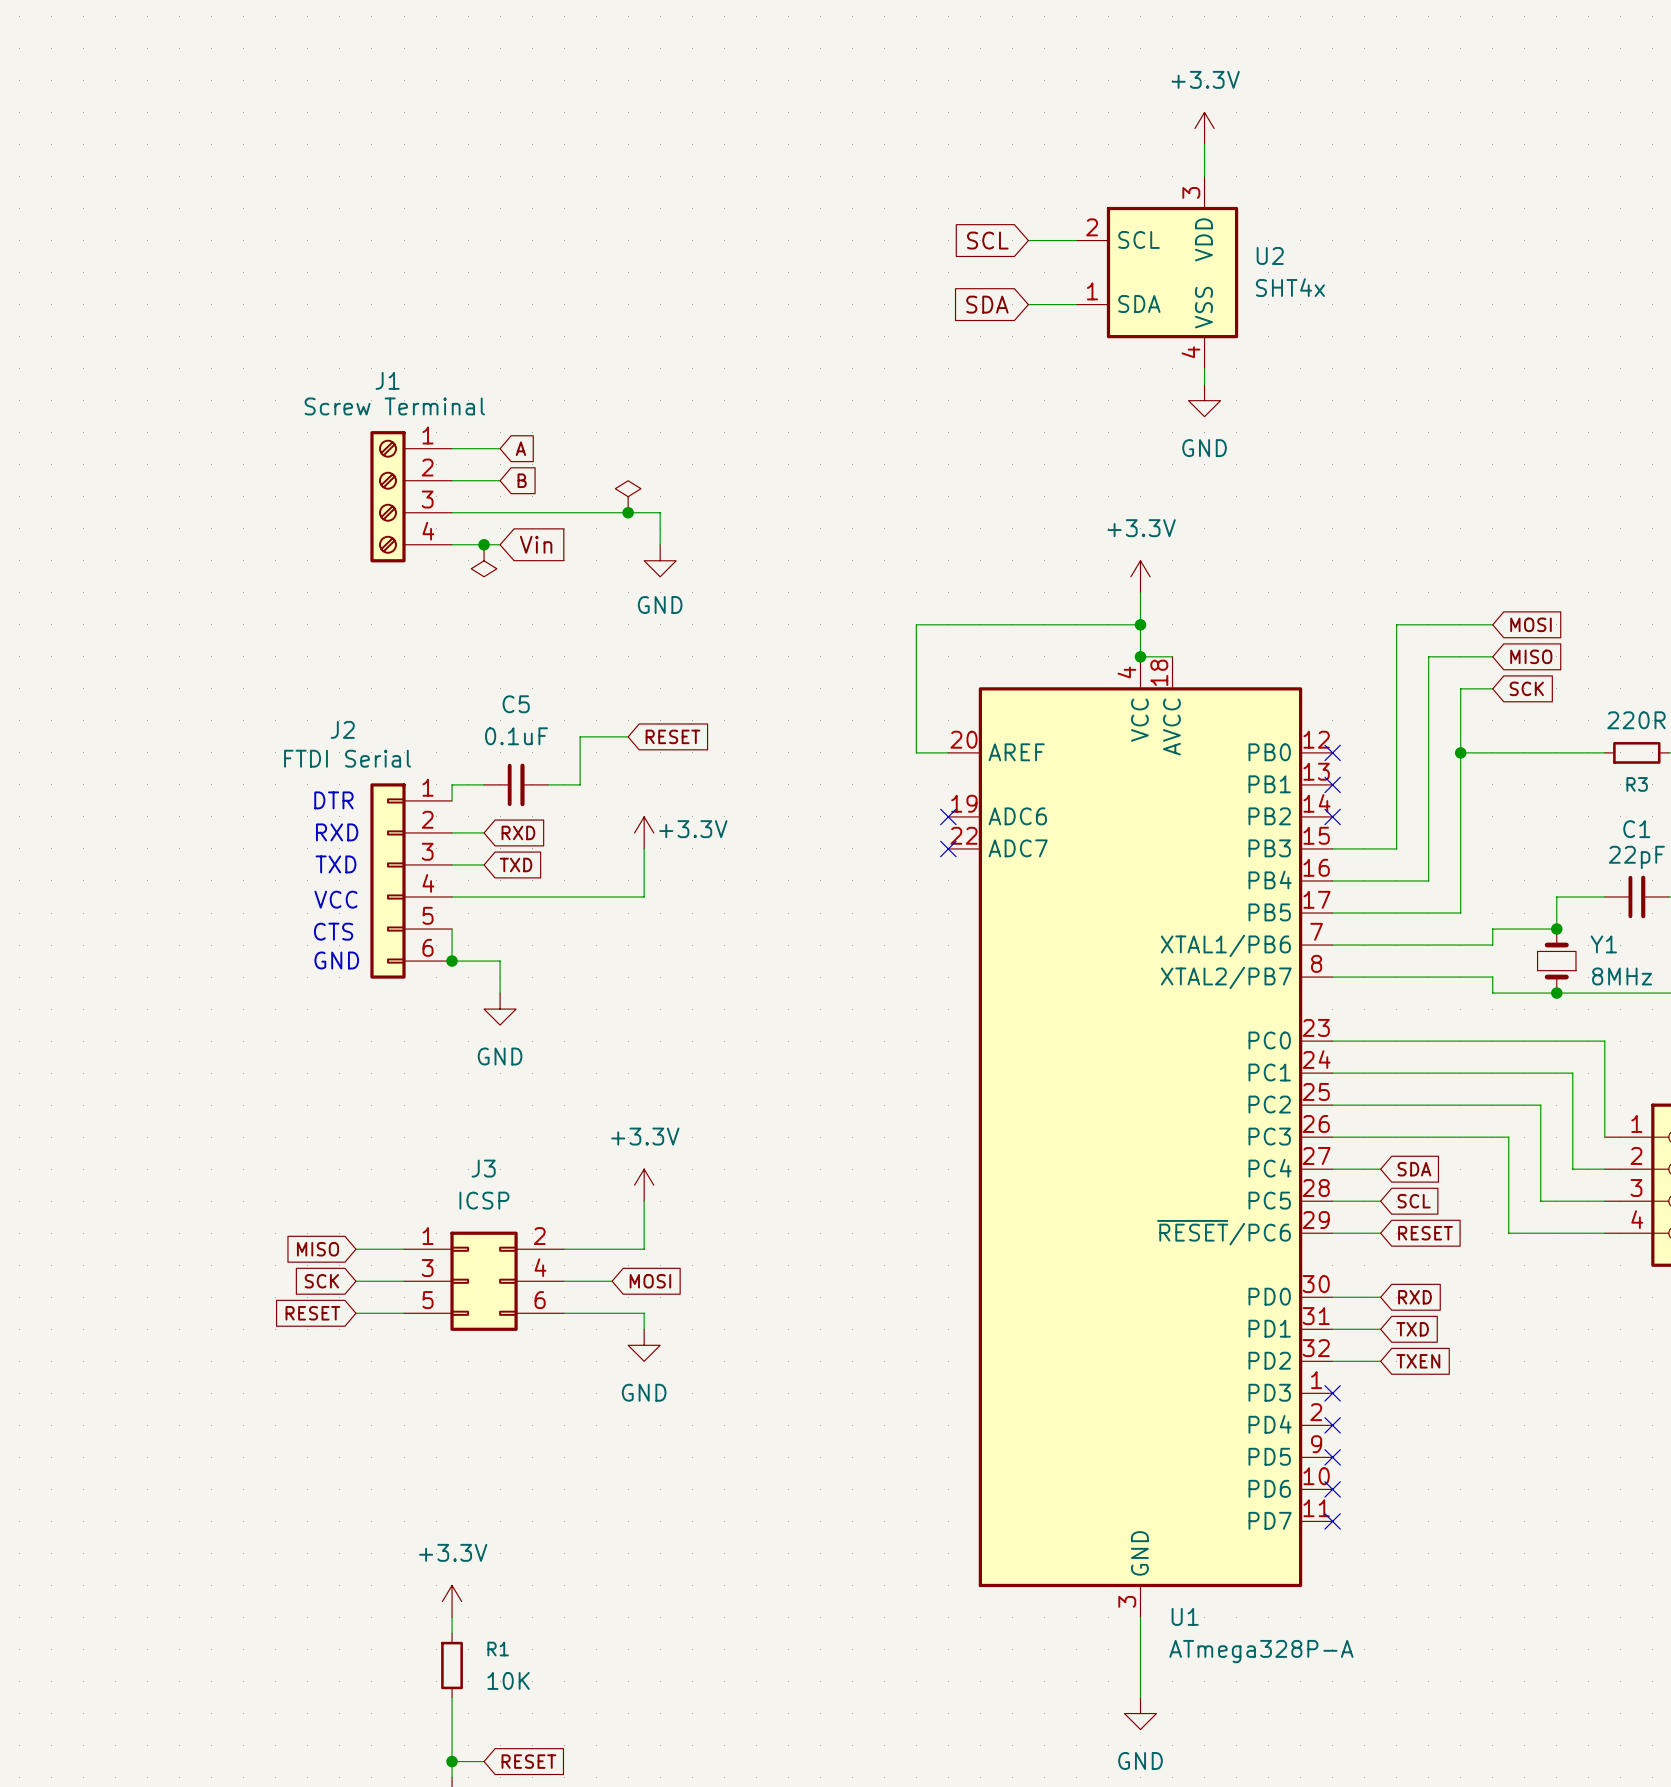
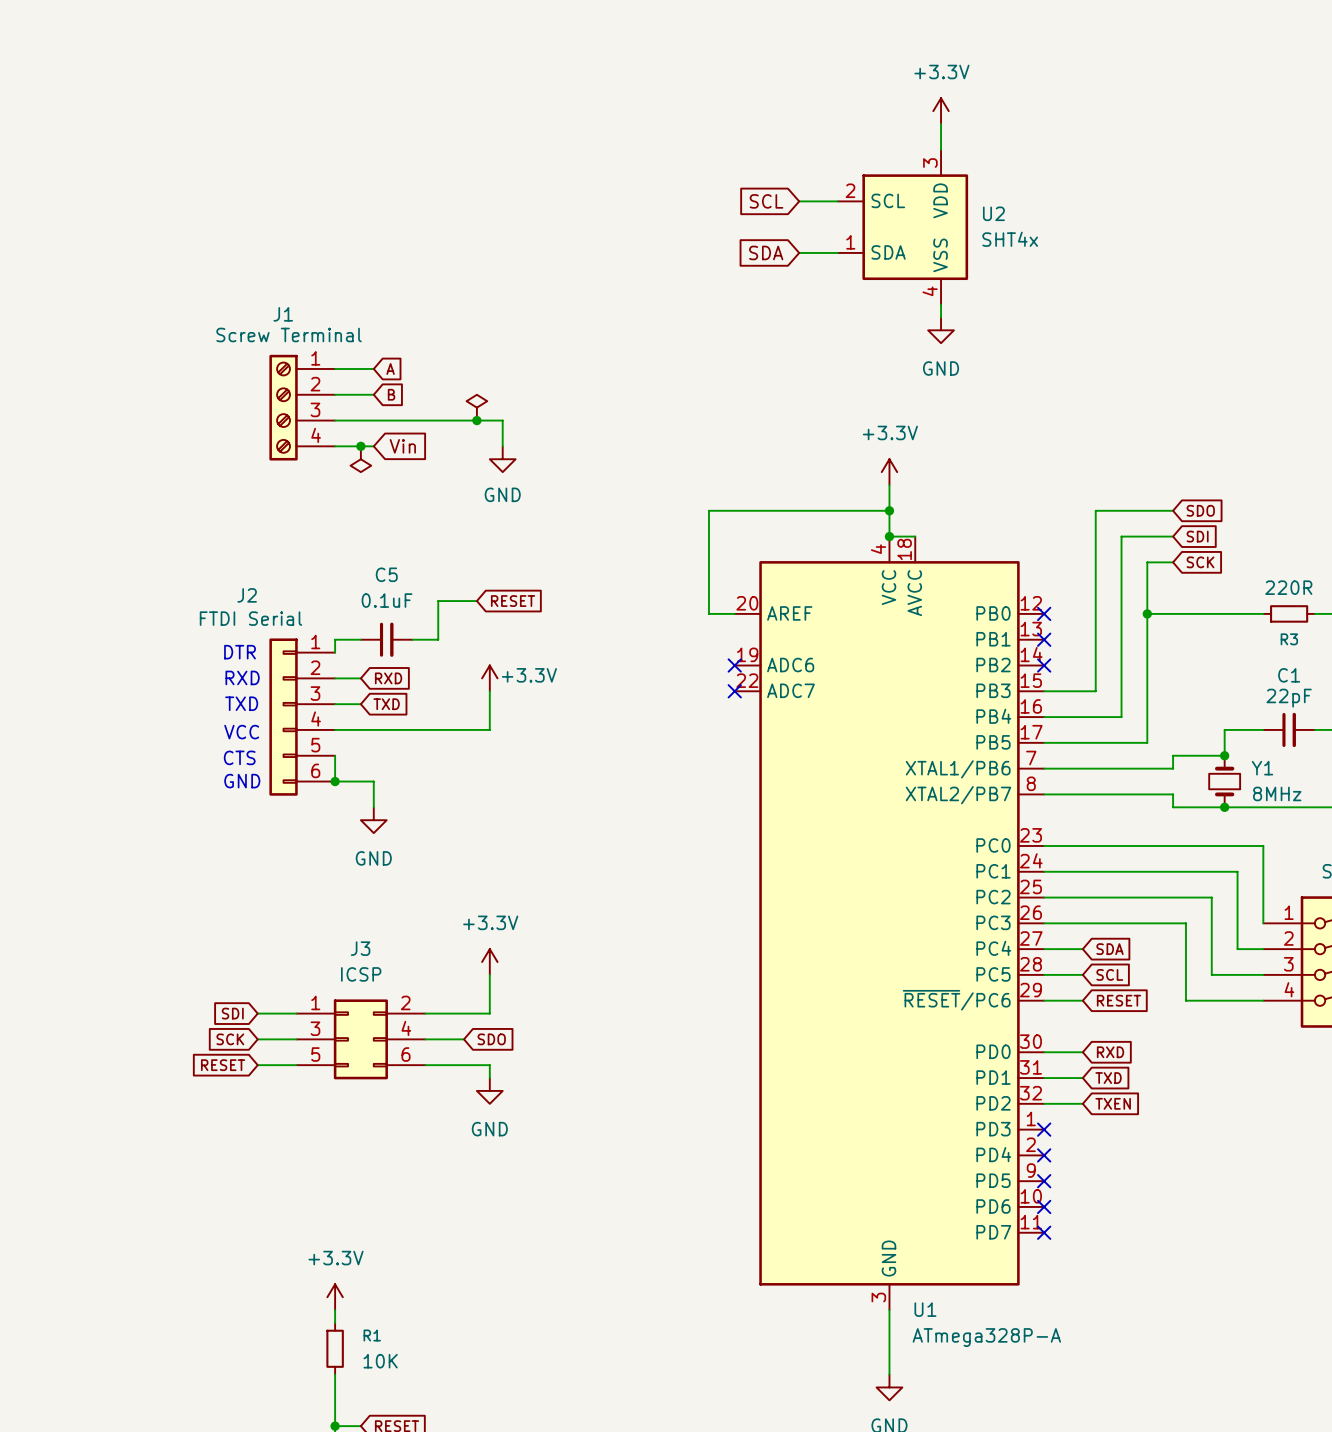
global label: MOSI (1530, 624) -> SDO (1200, 510)
global label: MISO (1531, 656) -> SDI (1197, 536)
global label: MISO (318, 1249) -> SDI (232, 1013)
global label: MOSI (650, 1281) -> SDO (491, 1039)

